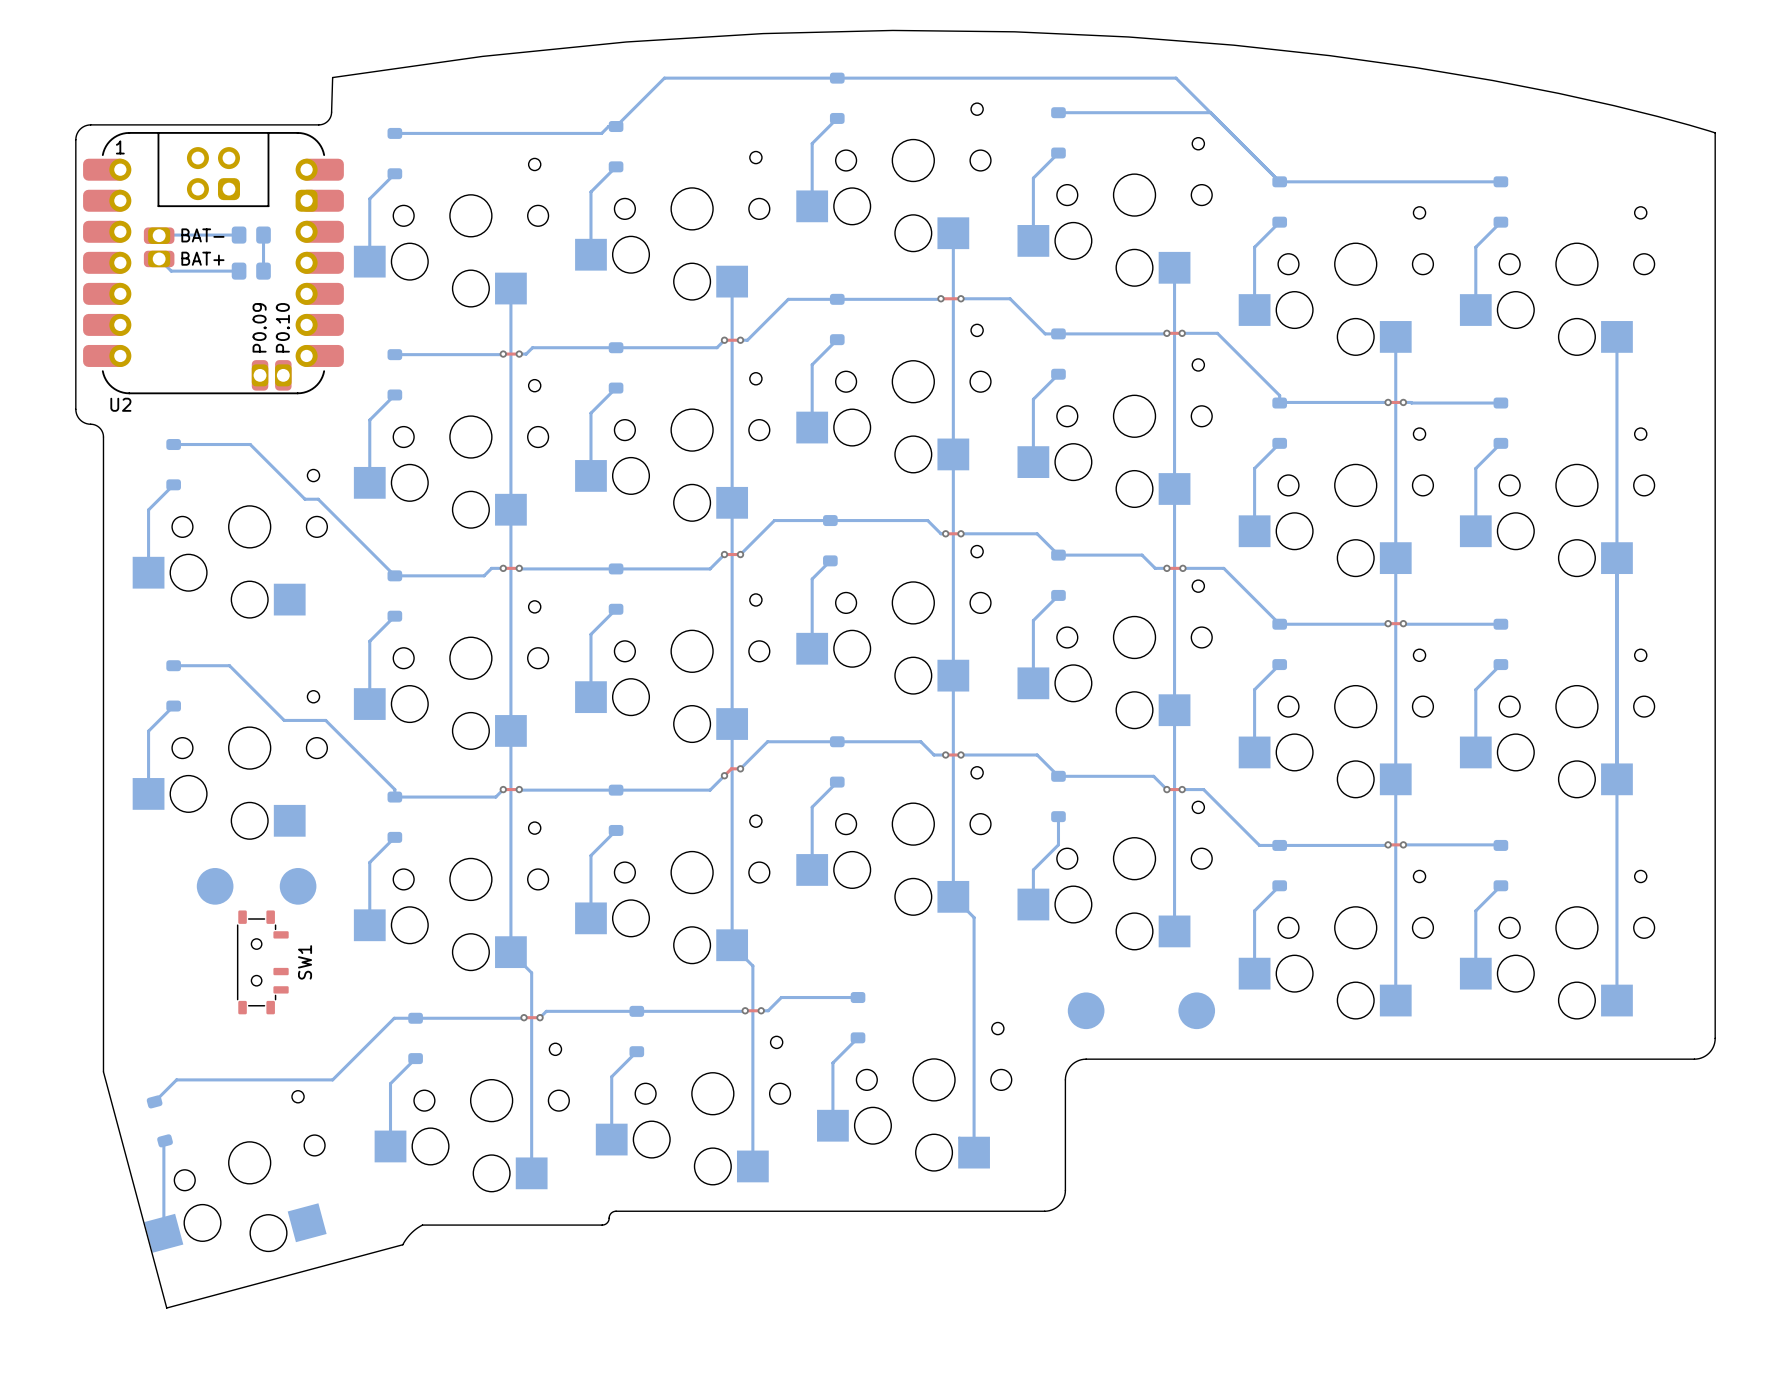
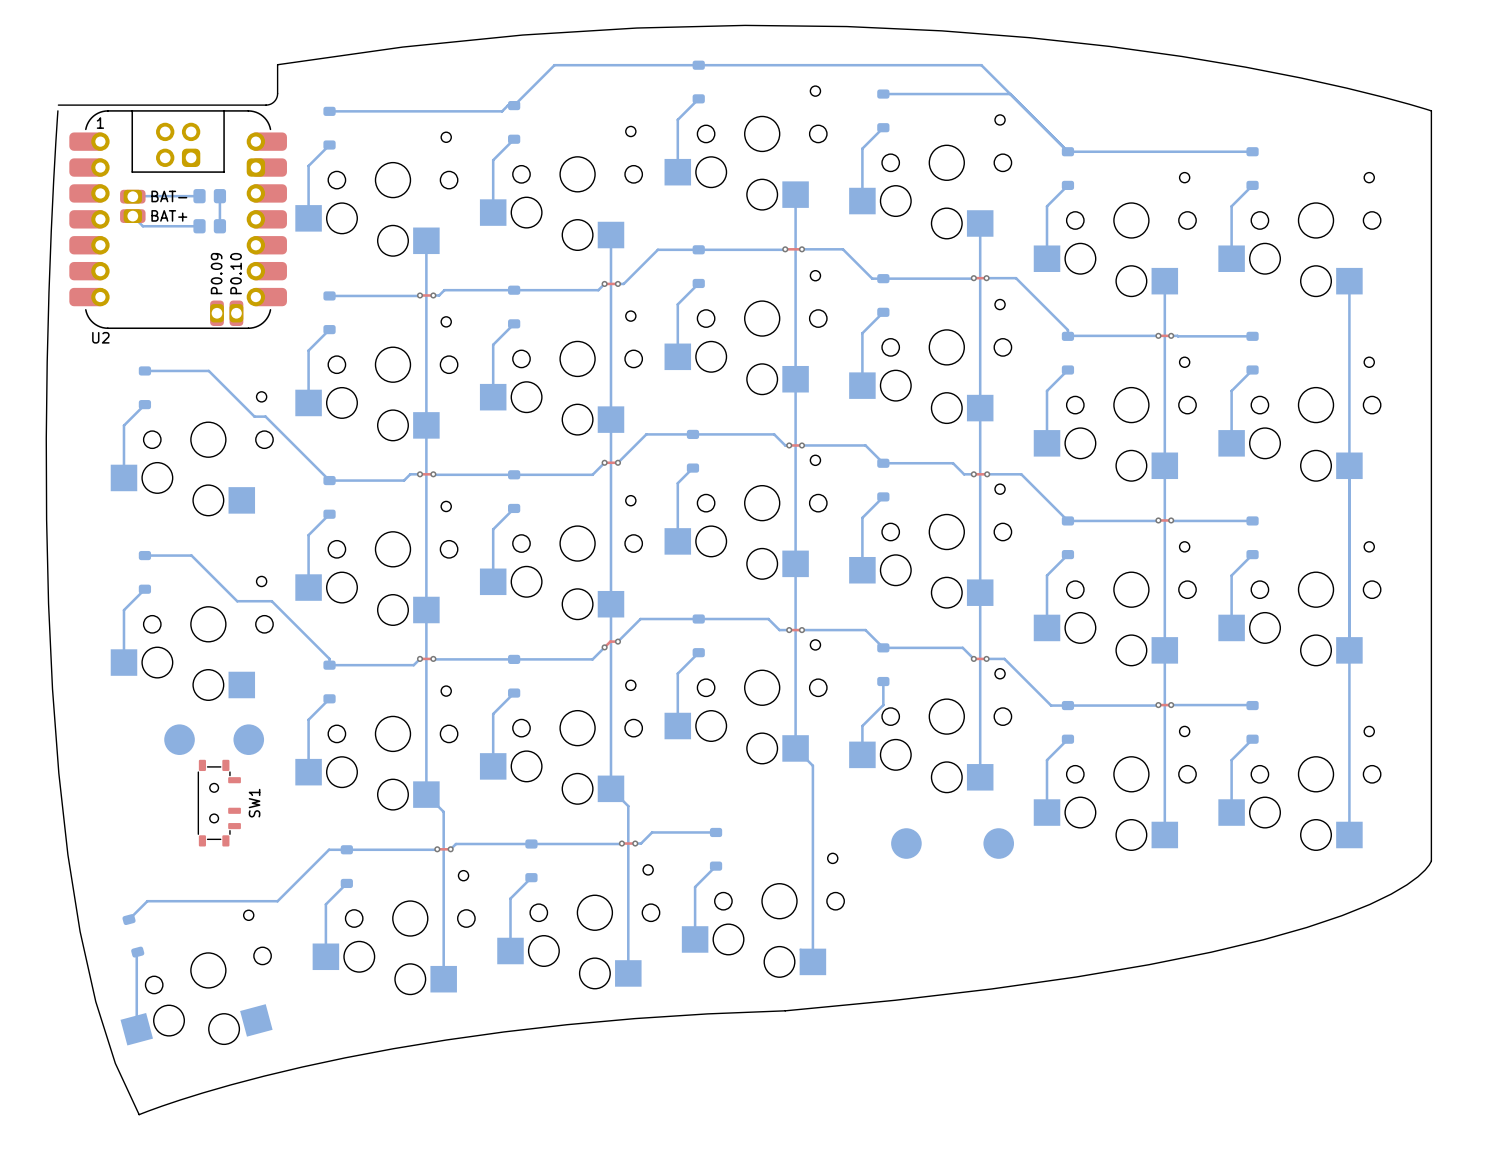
board edge: (332, 77) (331, 115) (327, 121) (322, 124) (90, 124) (85, 126) (78, 130) (75, 139) (75, 409) -> (277, 64) (277, 96) (274, 101) (268, 104) (58, 105)
board edge: (75, 409) (80, 419) (98, 427) (103, 437) (103, 1071) (166, 1308) (402, 1244) (411, 1232) (422, 1225) (603, 1225) (607, 1222) (611, 1213) (616, 1211) (1049, 1210) (1060, 1203) (1065, 1192) (1065, 1075) (1071, 1065) (1081, 1059) (1694, 1059) (1703, 1057) (1710, 1051) (1714, 1043) (1715, 1031) -> (57, 110) (48, 292) (46, 438) (48, 603) (58, 773) (67, 854) (80, 931) (95, 1001) (115, 1063) (139, 1114) (203, 1092) (264, 1076) (345, 1057) (446, 1040) (567, 1024) (634, 1018) (785, 1010) (895, 1000) (991, 988) (1149, 964) (1263, 939) (1341, 915) (1369, 904) (1407, 884) (1425, 870) (1431, 860)

